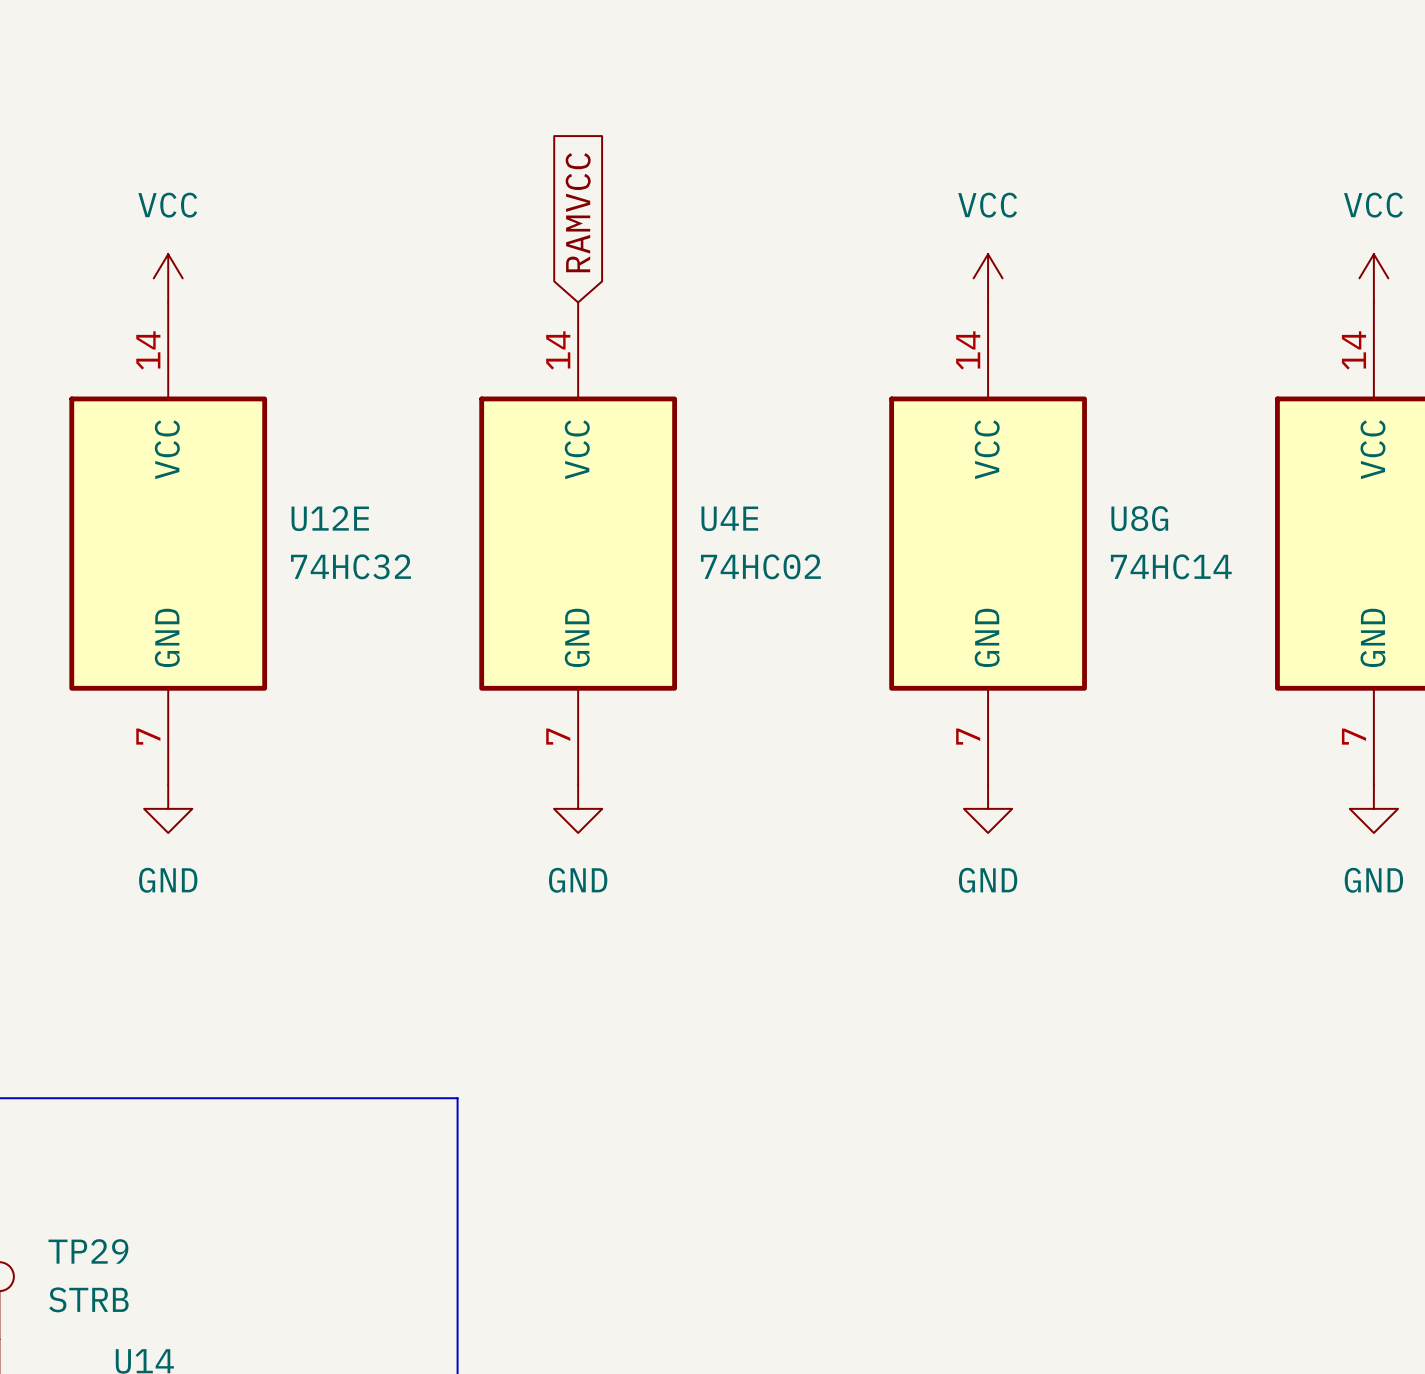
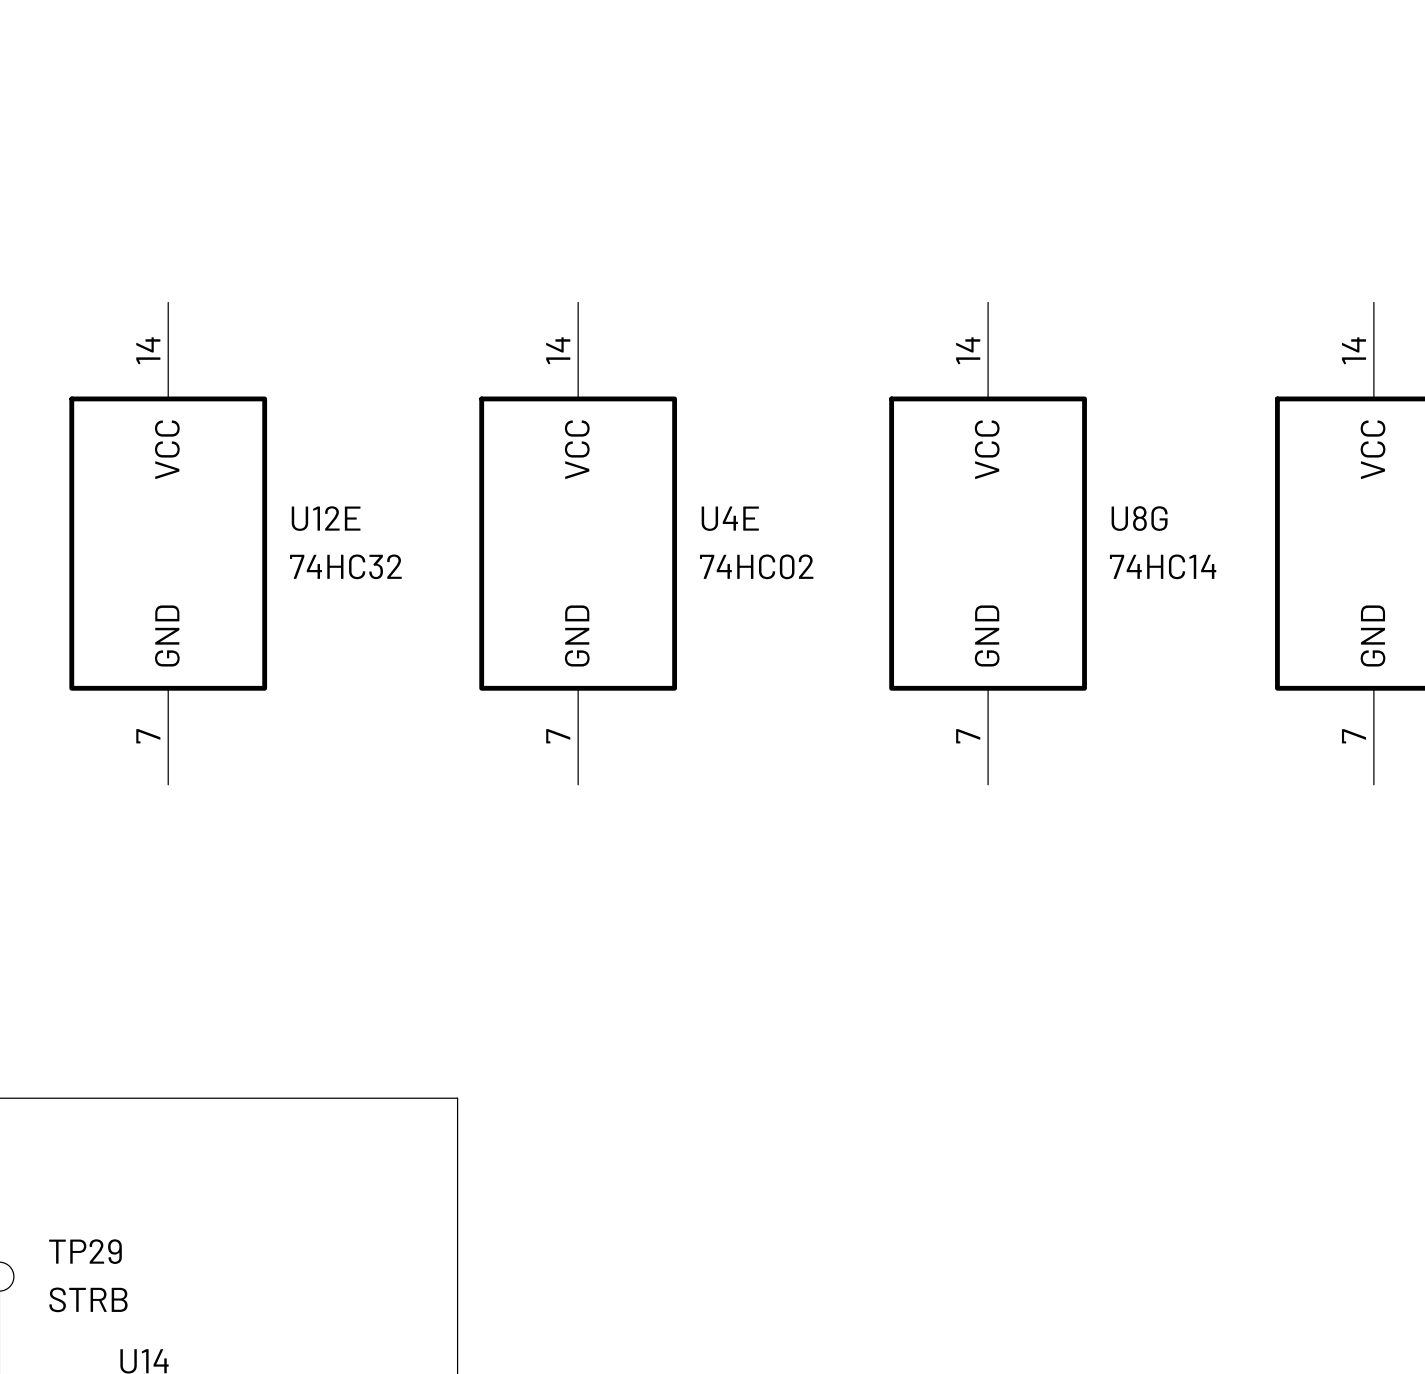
global label: RAMVCC (578, 212) -> none
power symbol: VCC (168, 278) -> none
power symbol: VCC (988, 278) -> none
power symbol: VCC (1373, 278) -> none
power symbol: GND (168, 808) -> none
power symbol: GND (578, 808) -> none
power symbol: GND (988, 808) -> none
power symbol: GND (1373, 808) -> none

